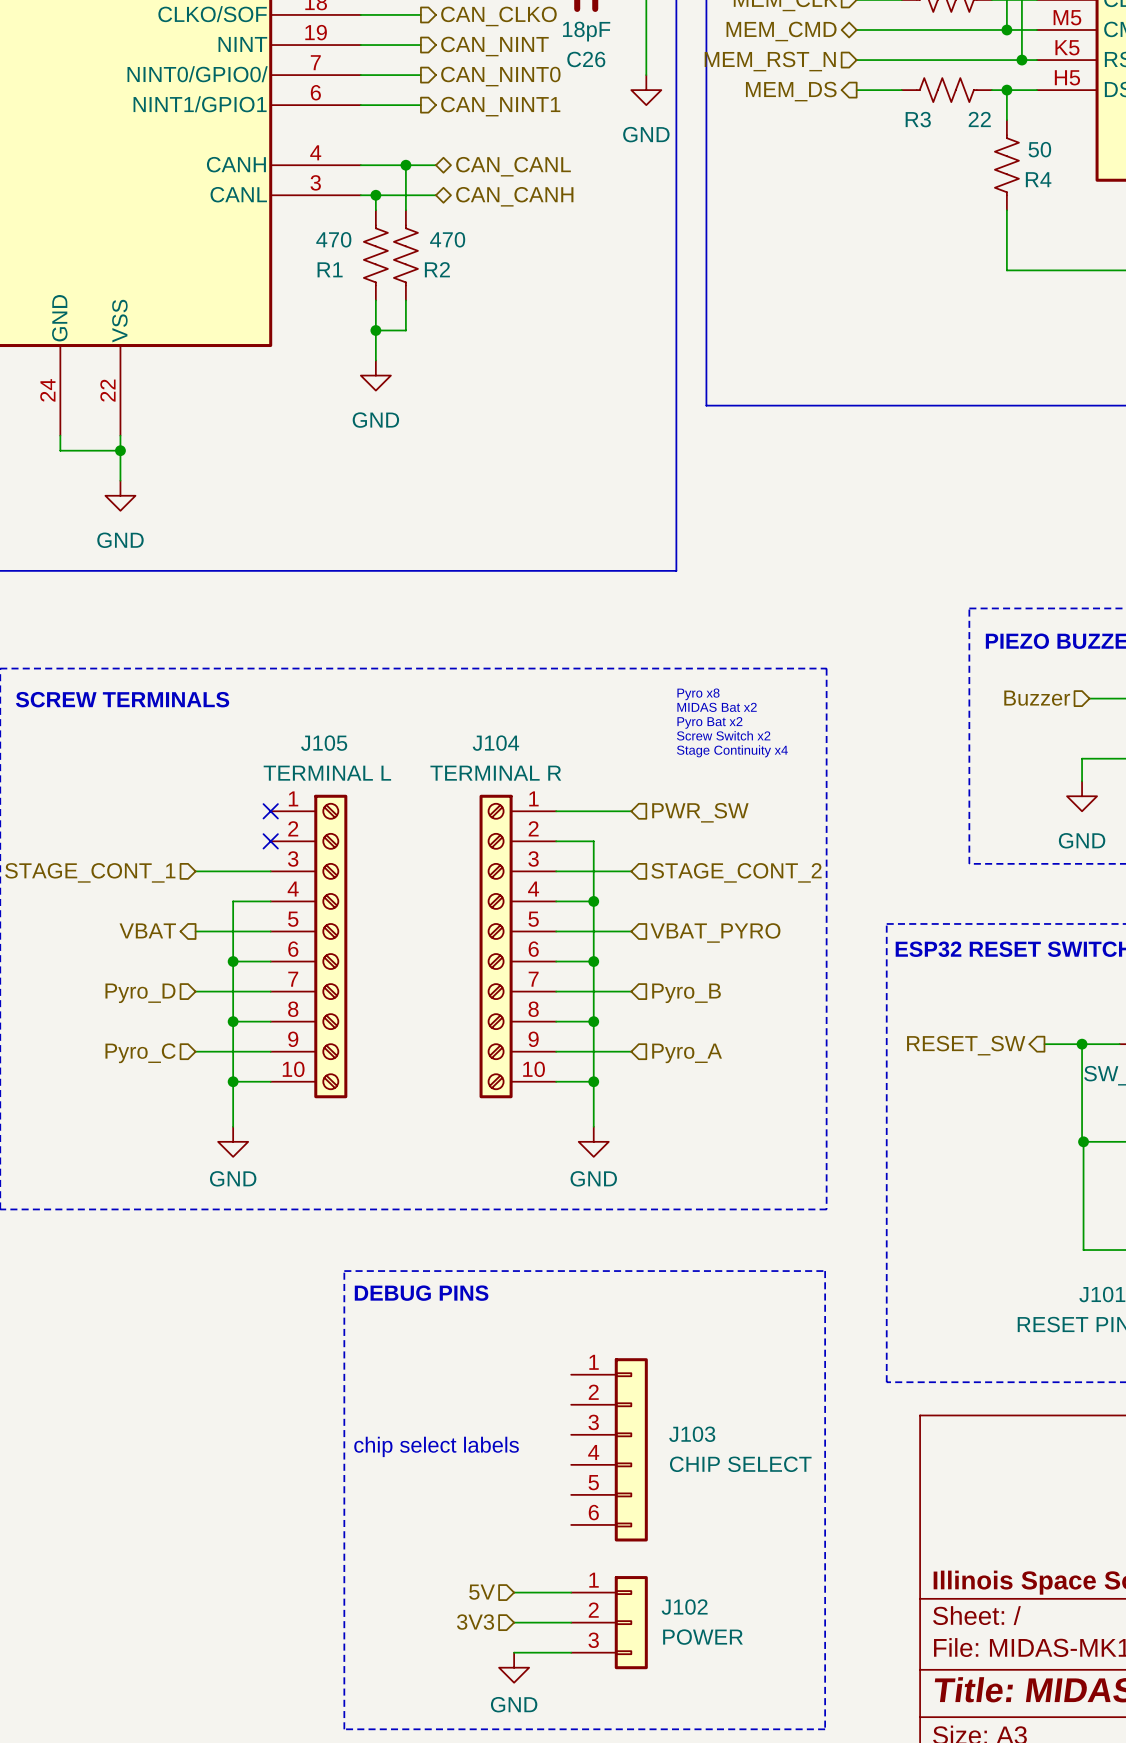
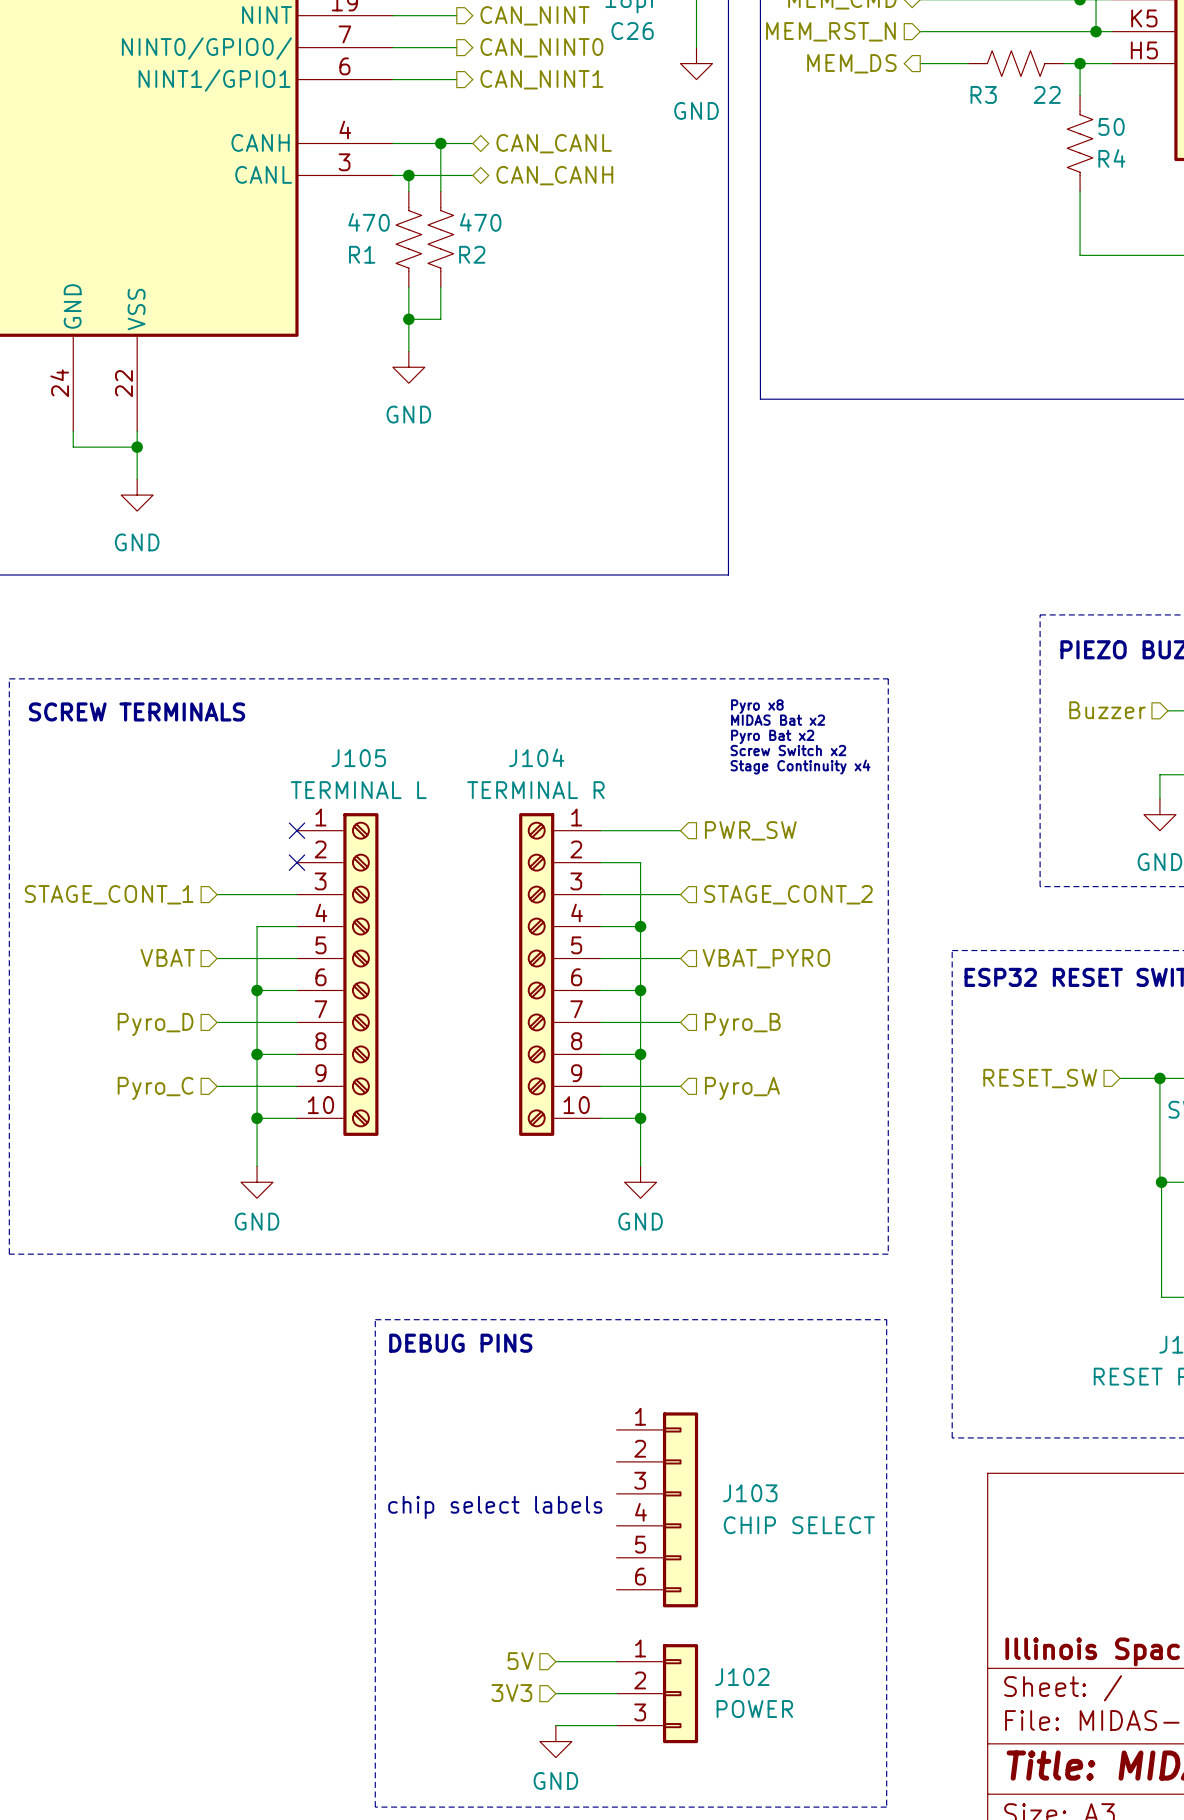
hierarchical label shape: output (147, 930) -> input (167, 957)
hierarchical label shape: output (966, 1045) -> input (1040, 1078)

